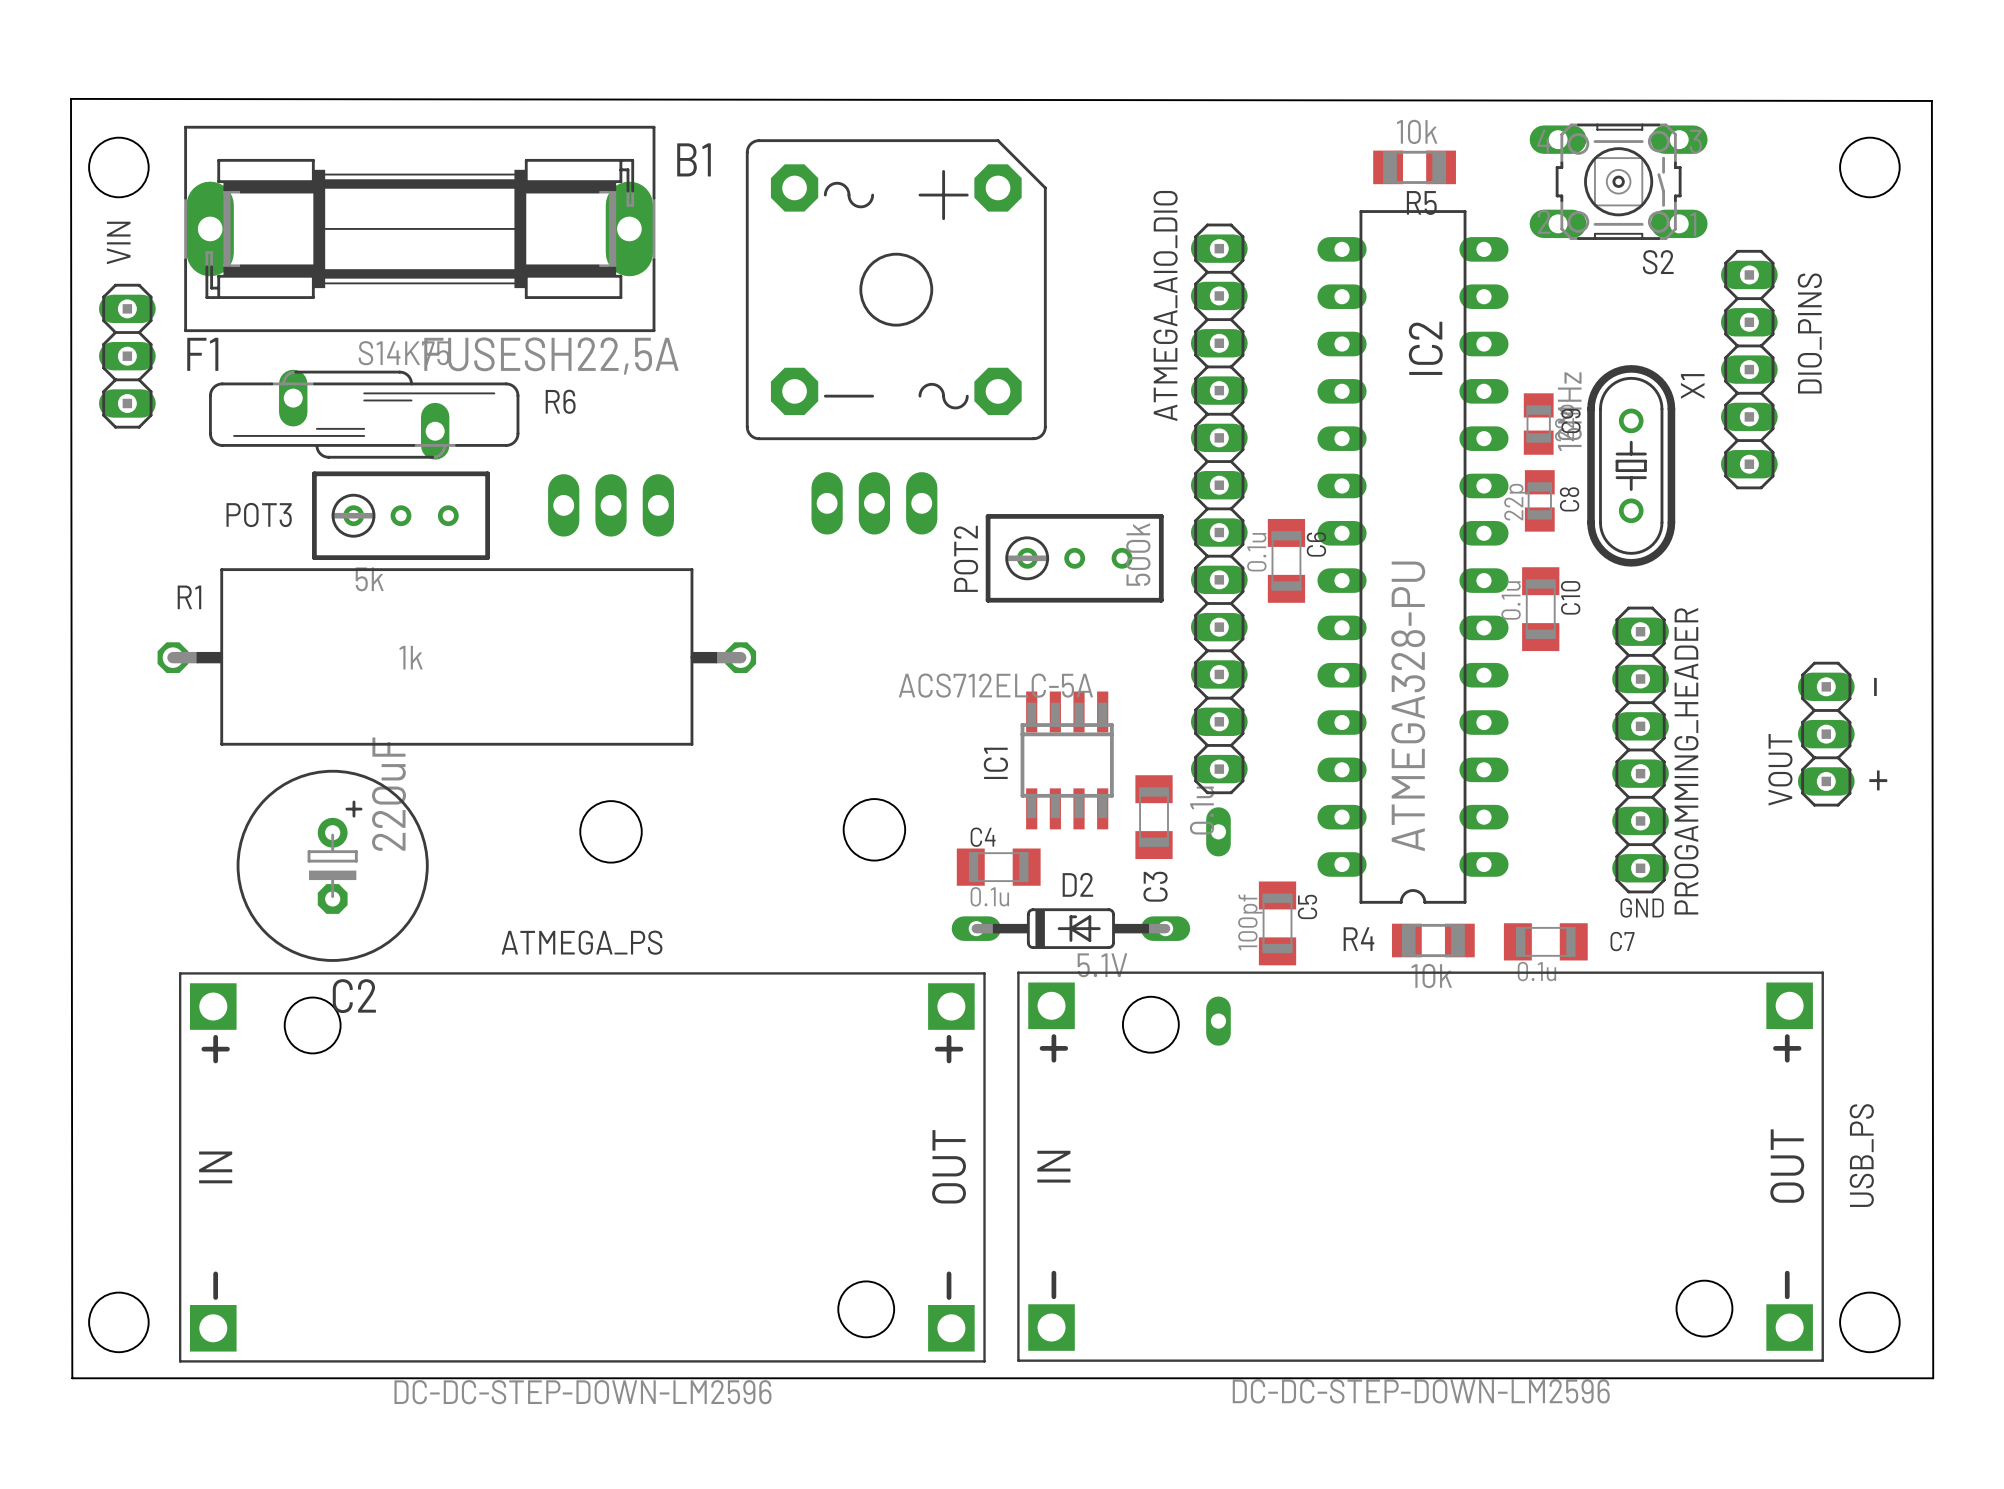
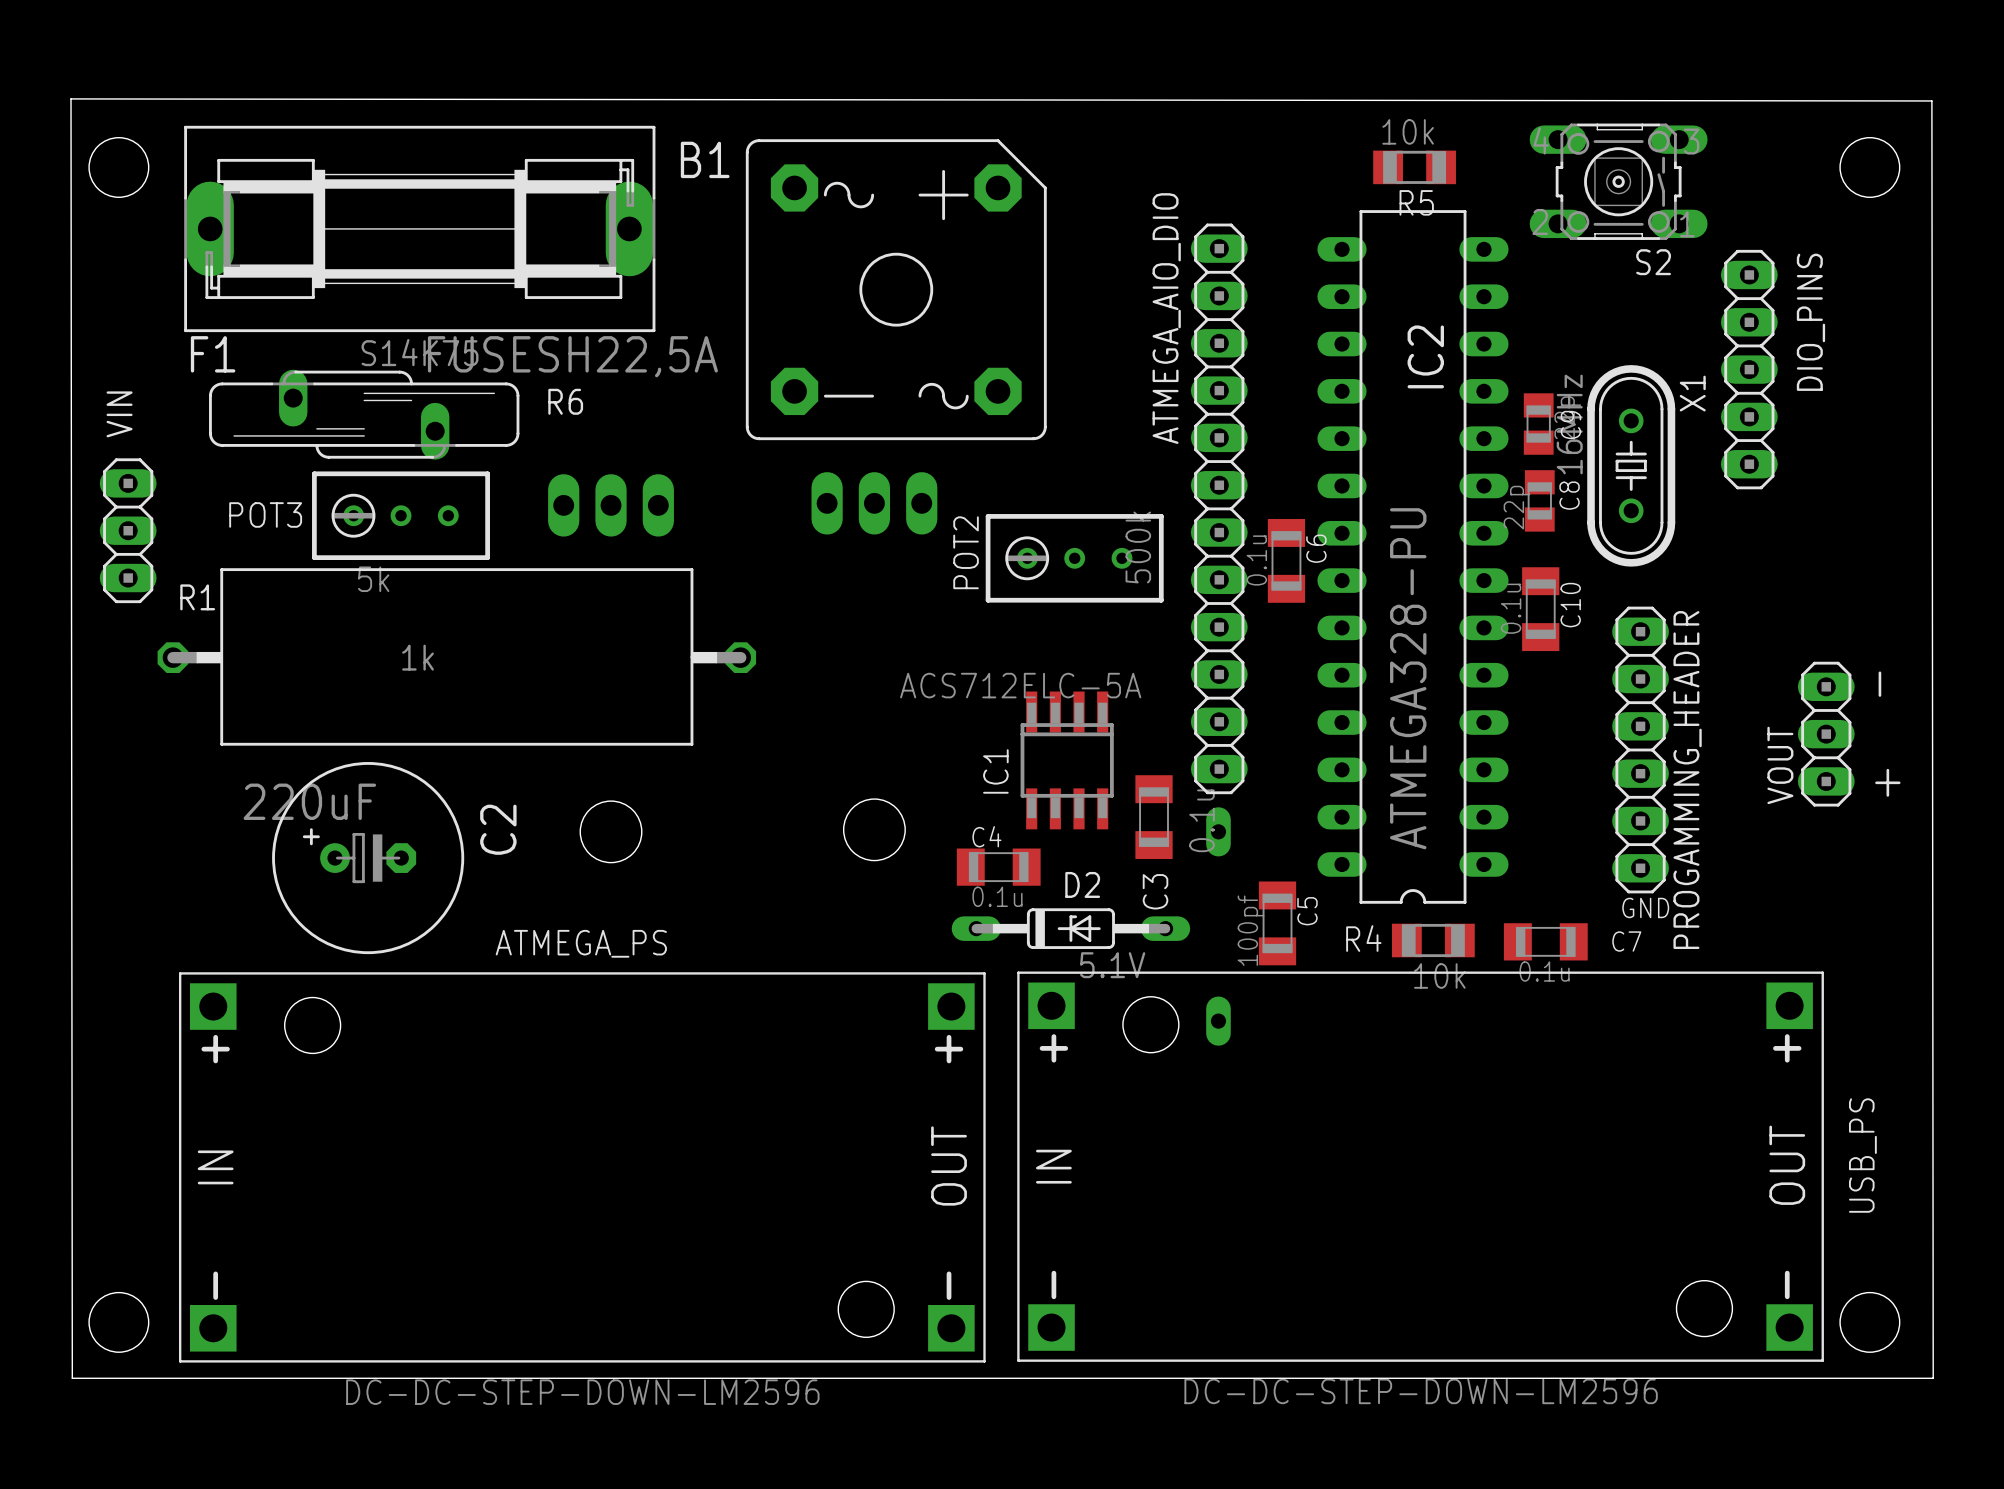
VIN position: (127, 356) -> (128, 530)
C2 rotation: 0° (332, 865) -> 90° counterclockwise (368, 858)

